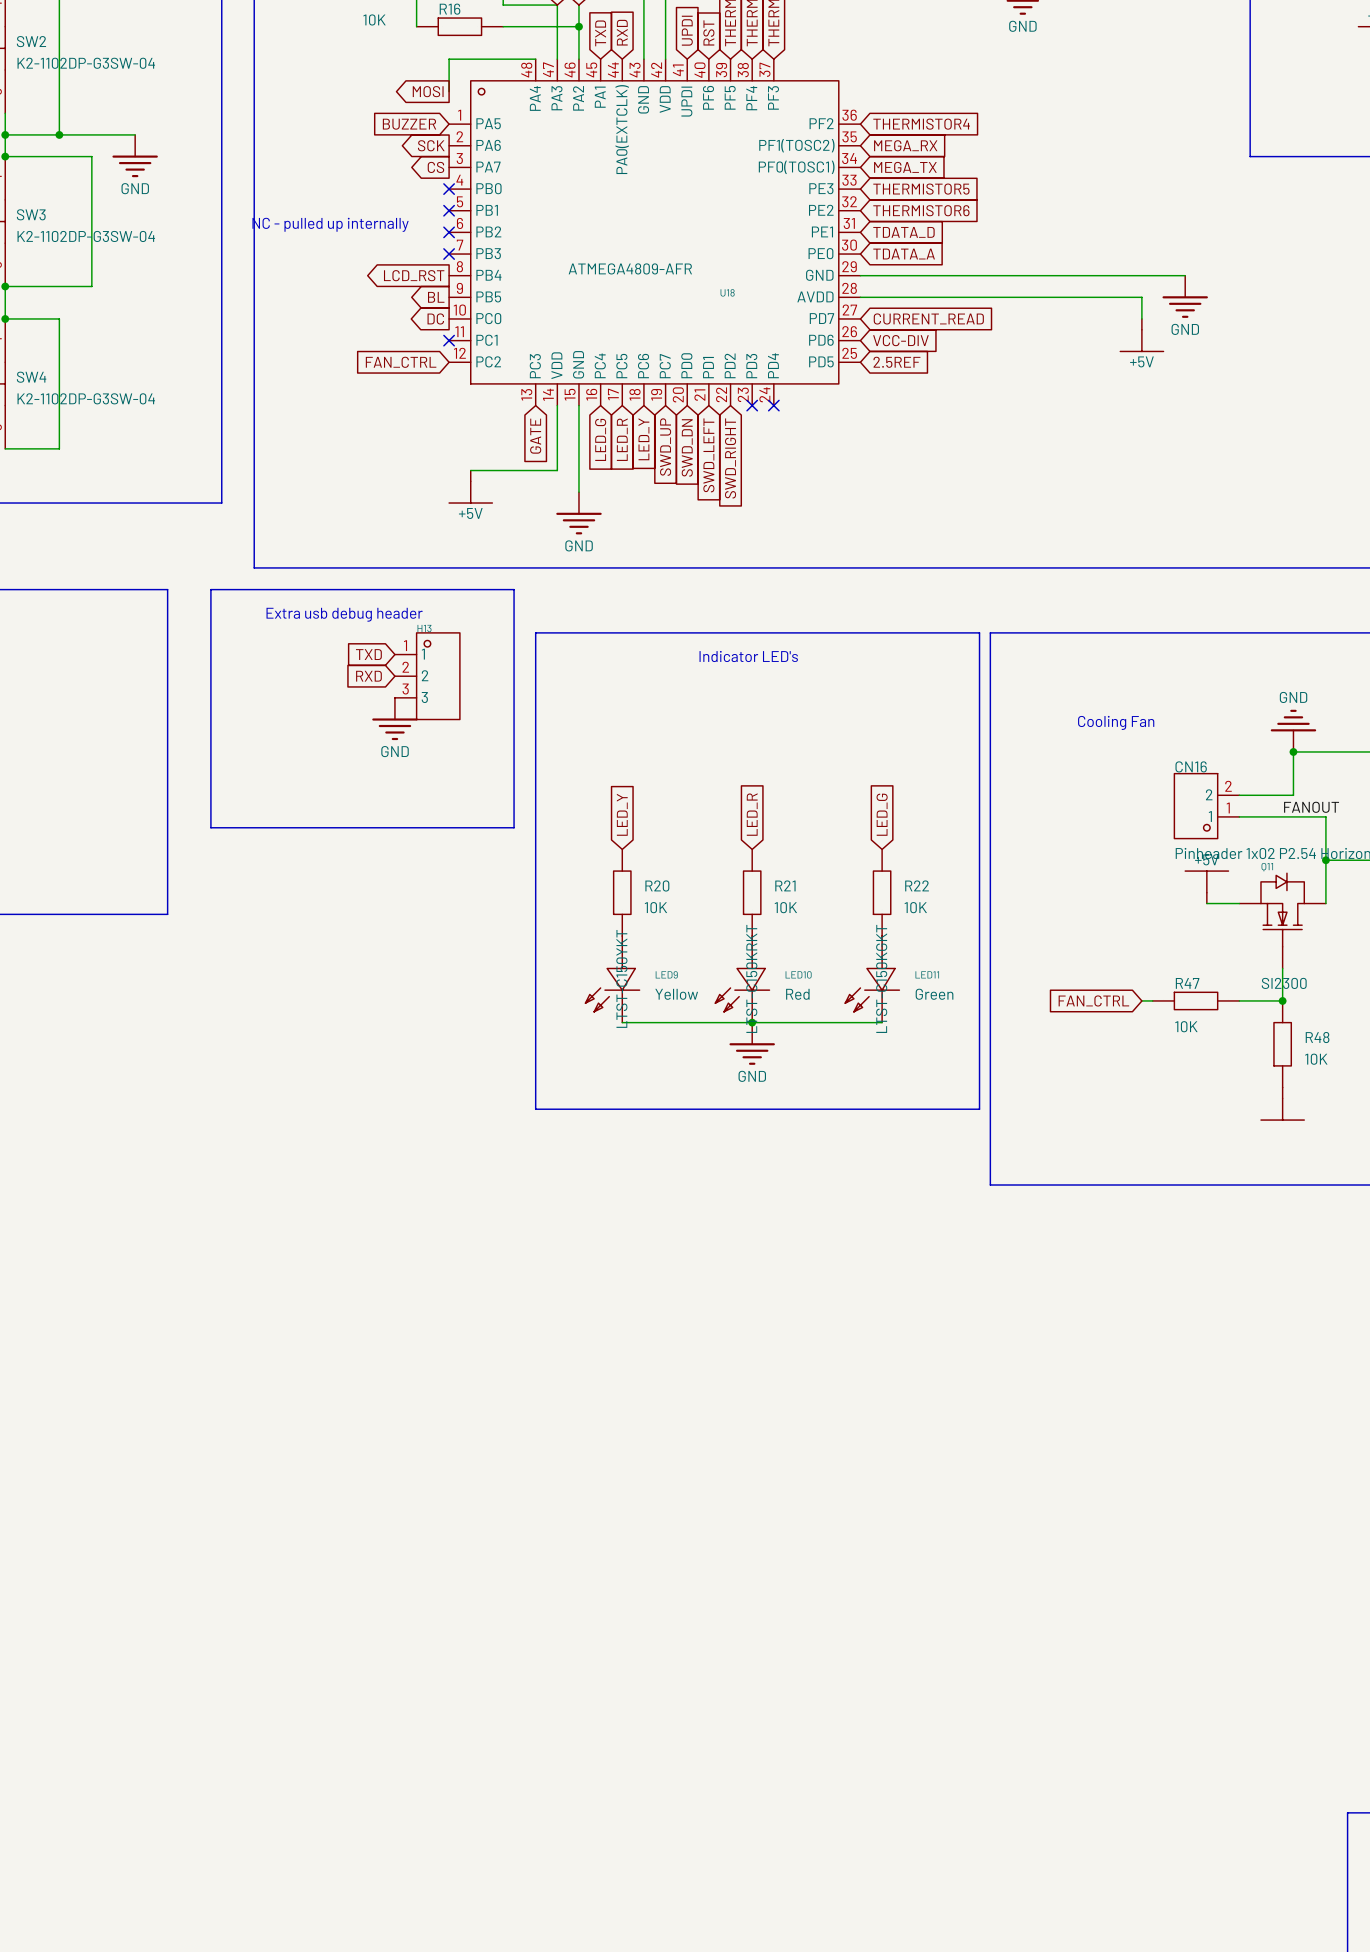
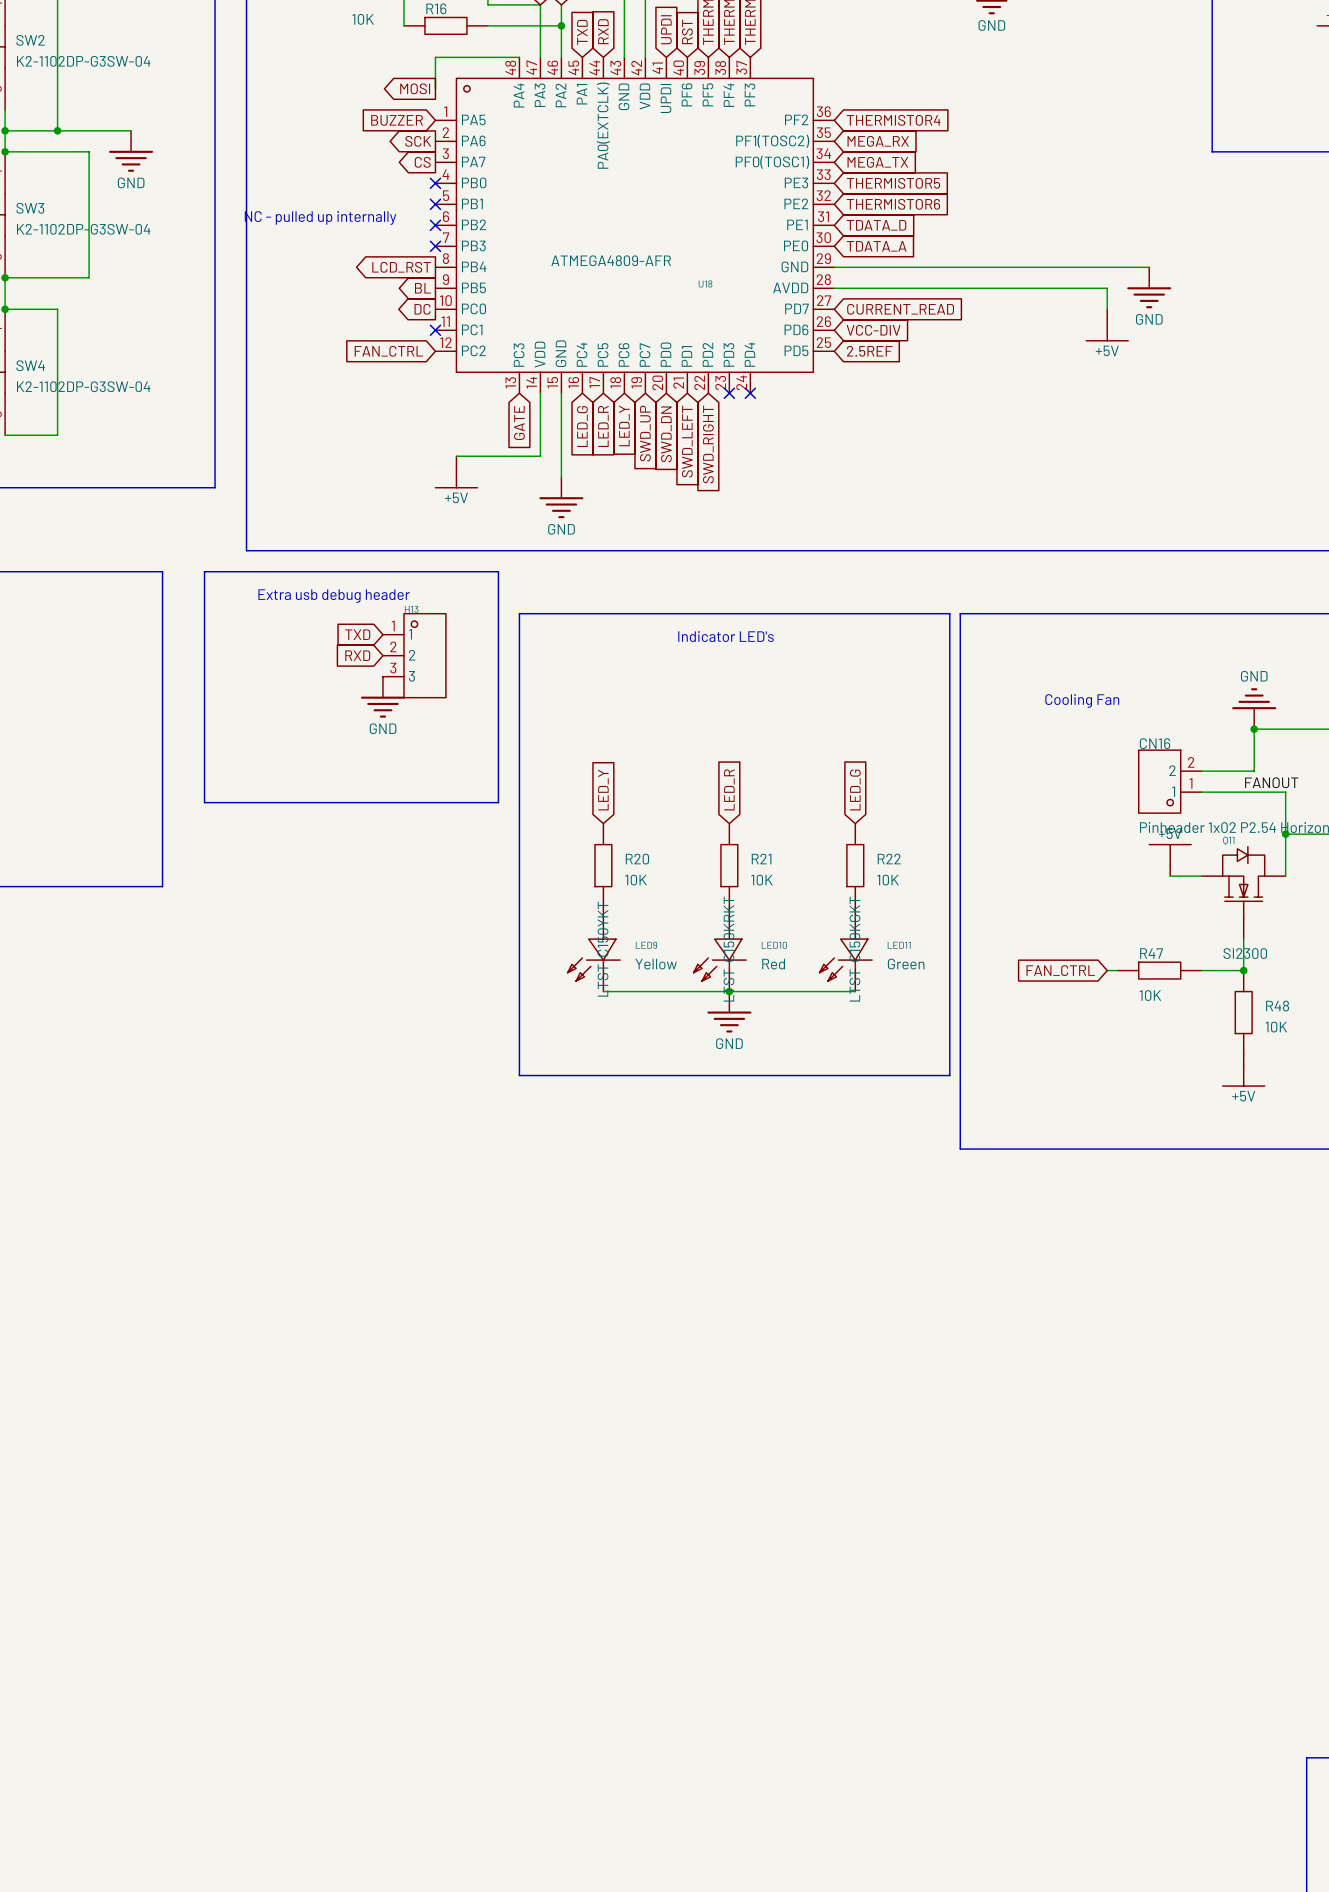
power symbol text: none -> +5V (1243, 1096)

